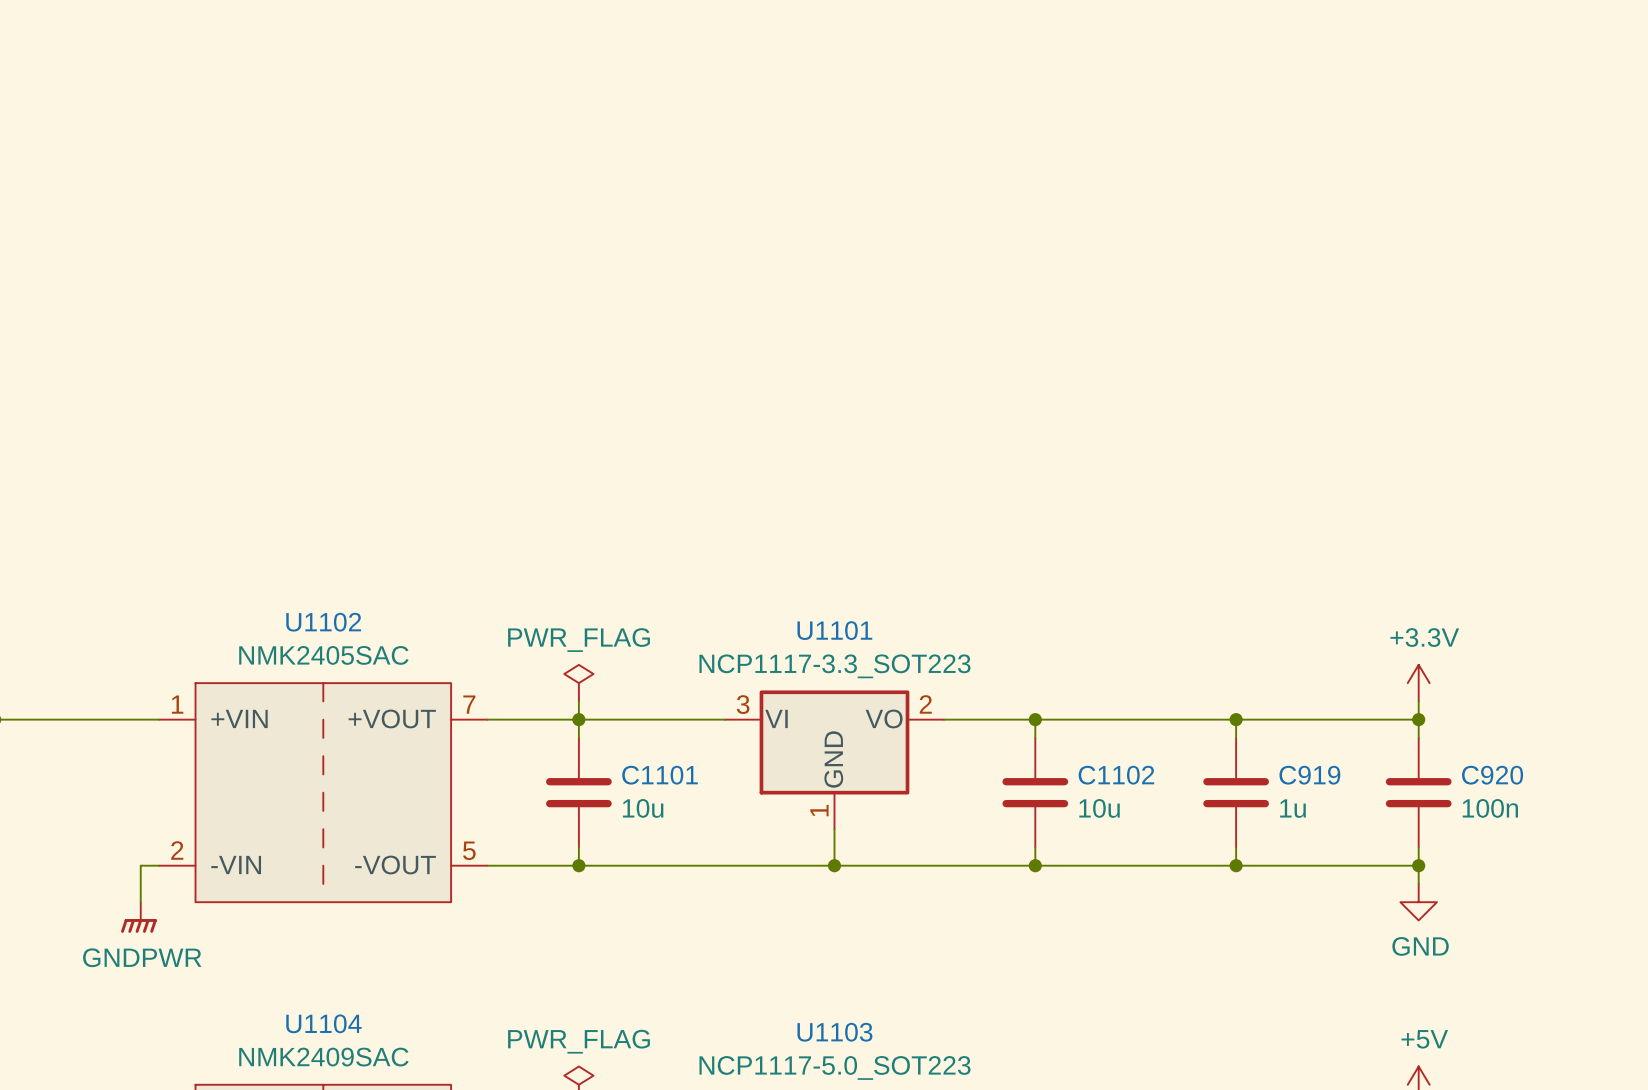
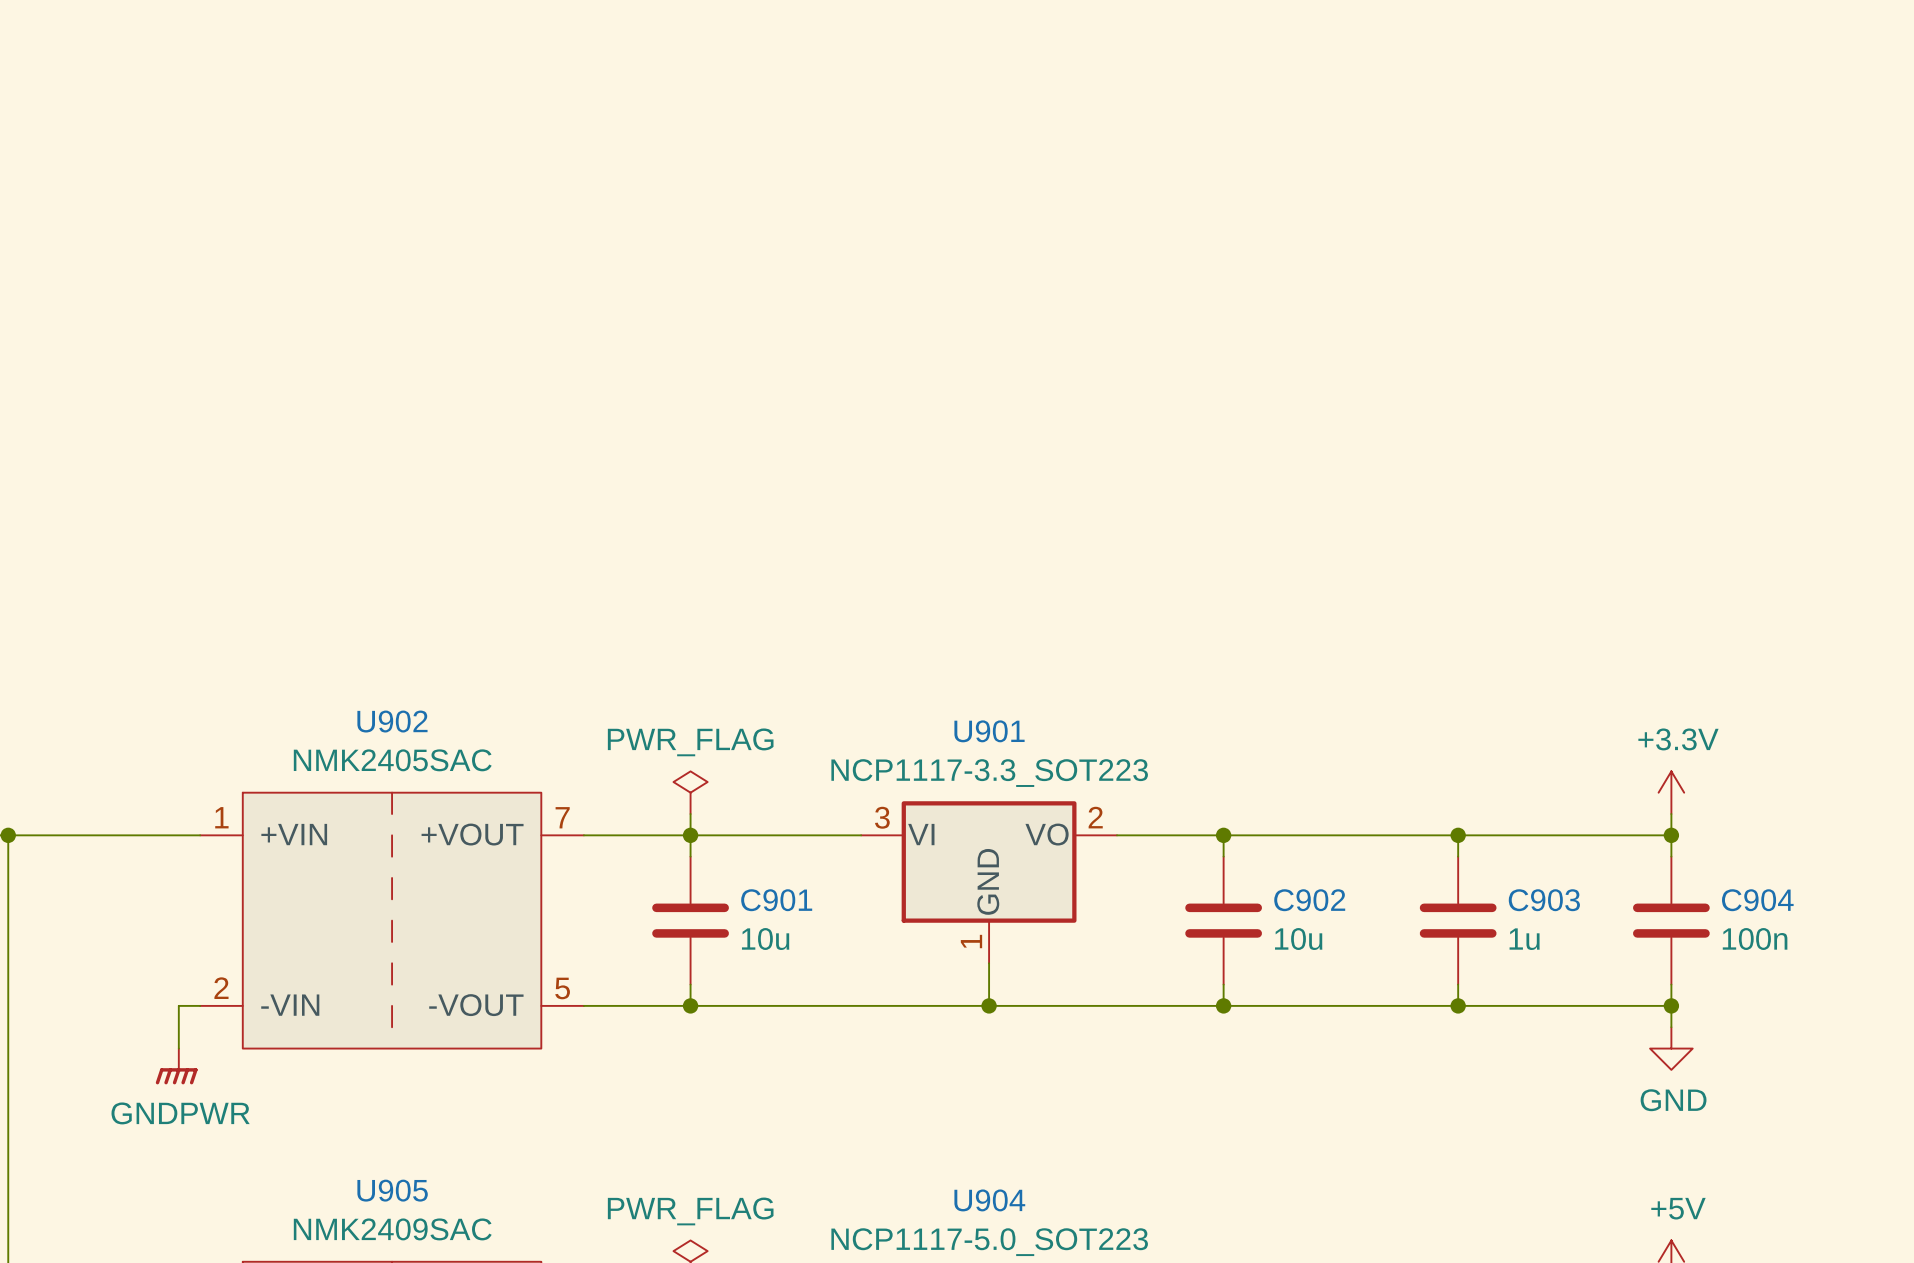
U1102 name: U1102 (323, 622) -> U902 (392, 721)
U1101 name: U1101 (834, 630) -> U901 (989, 731)
C1101 name: C1101 (660, 775) -> C901 (776, 900)
C1102 name: C1102 (1116, 775) -> C902 (1309, 900)
C919 name: C919 (1309, 775) -> C903 (1544, 900)
C920 name: C920 (1492, 775) -> C904 (1757, 900)
U1104 name: U1104 (323, 1023) -> U905 (392, 1190)
U1103 name: U1103 (834, 1032) -> U904 (989, 1200)

